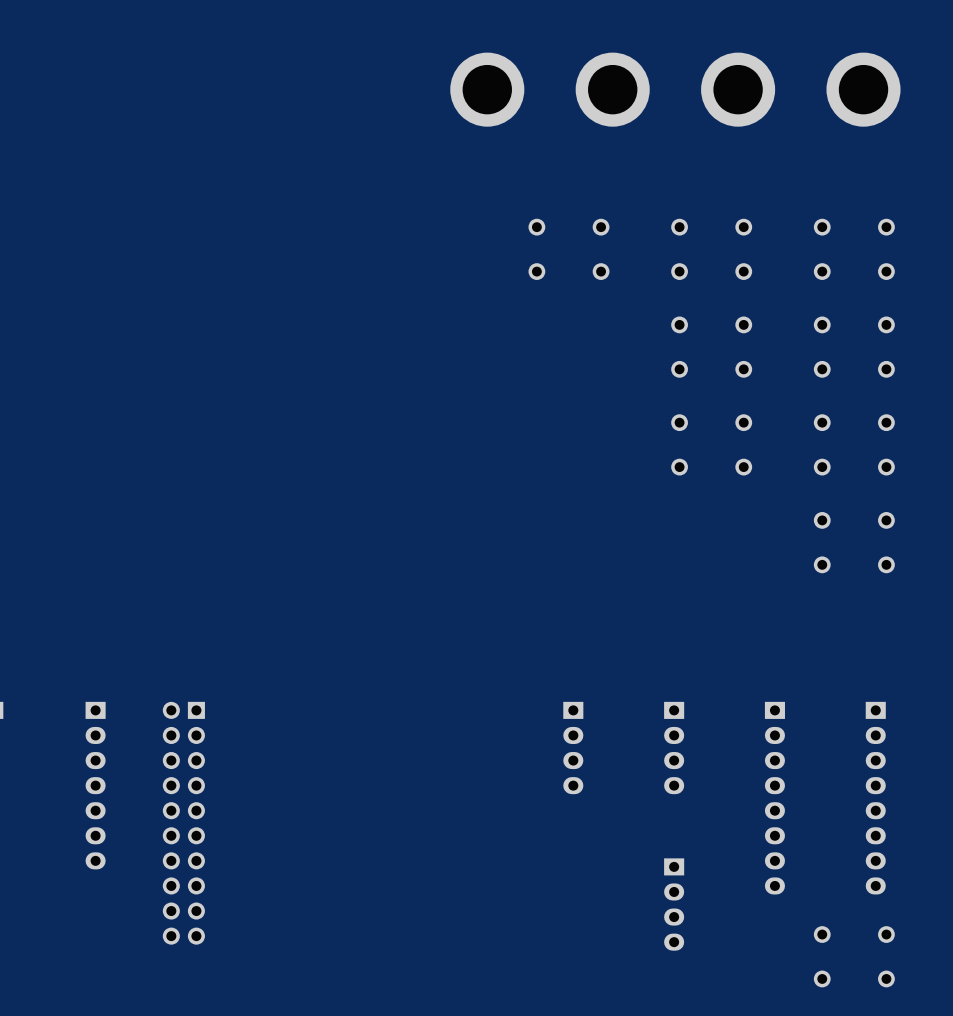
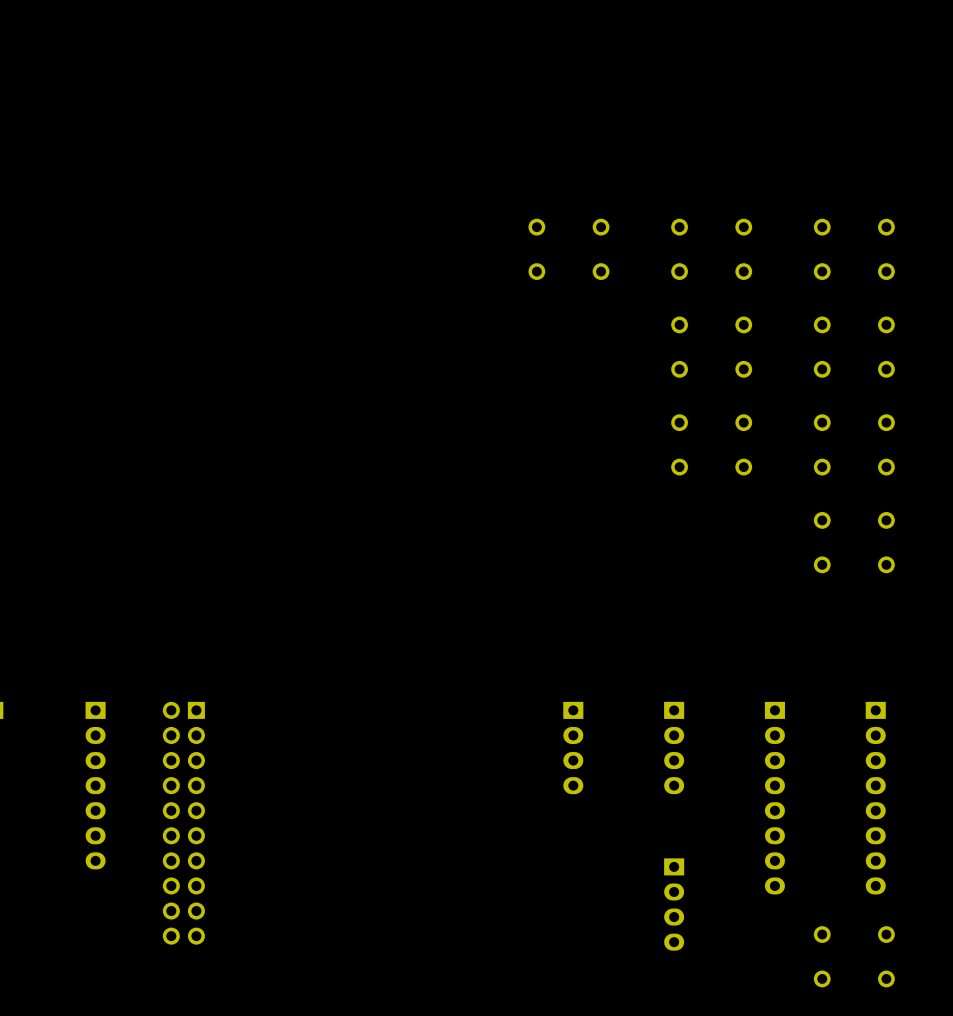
part: (487, 89) -> none
part: (612, 89) -> none
part: (738, 89) -> none
part: (863, 89) -> none

